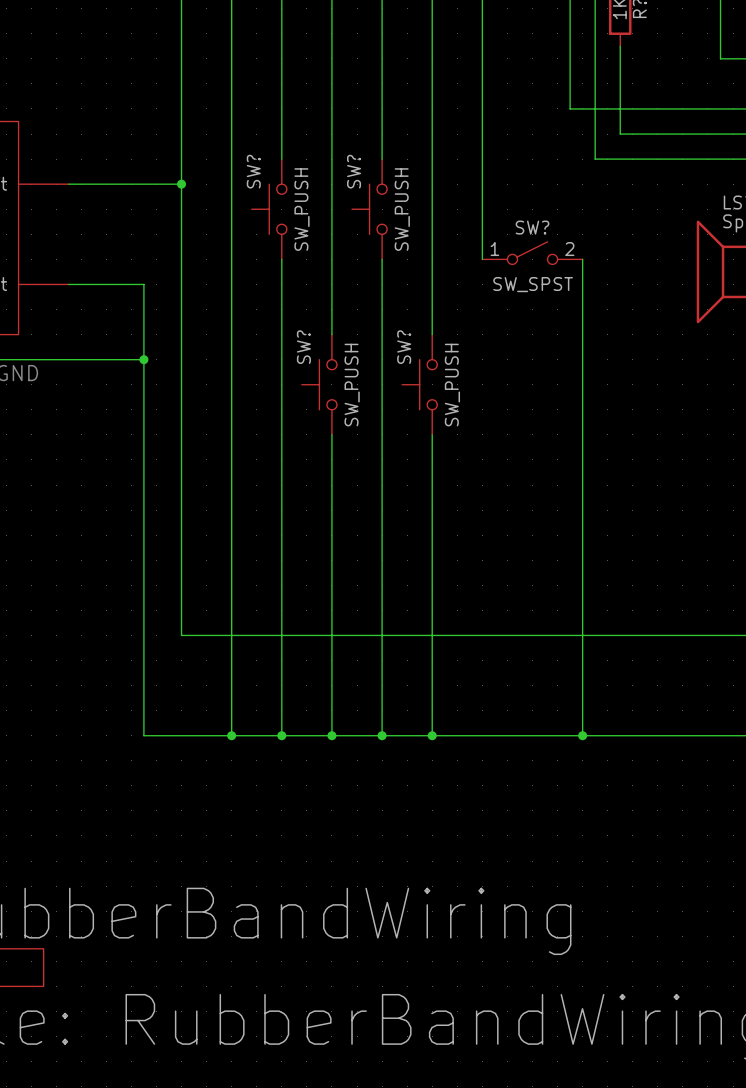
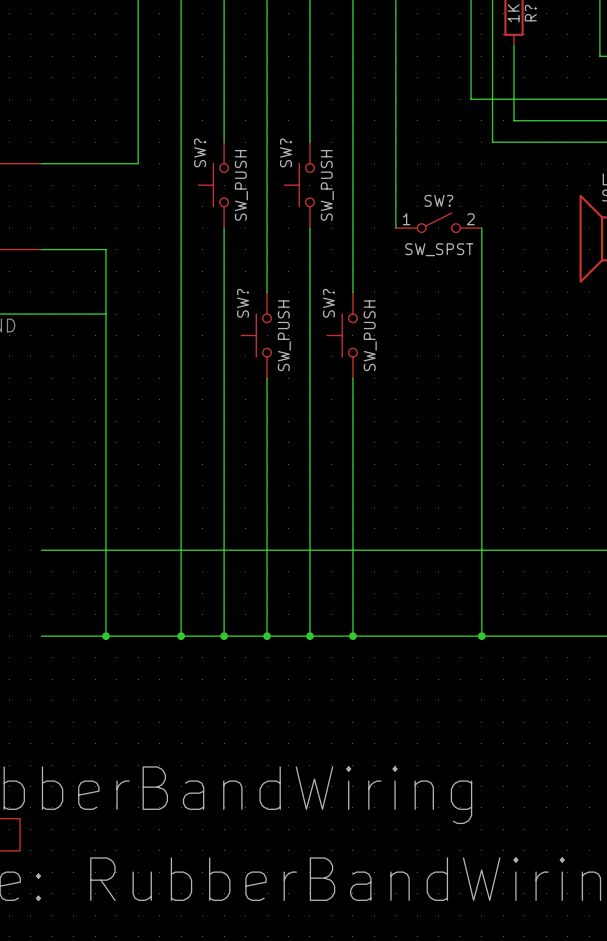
wire: (181, 184) (181, 635) -> (41, 550) (138, 550)
junction: (181, 184) -> none
junction: (143, 359) -> none
wire: none -> (41, 636) (105, 636)
junction: none -> (105, 636)

